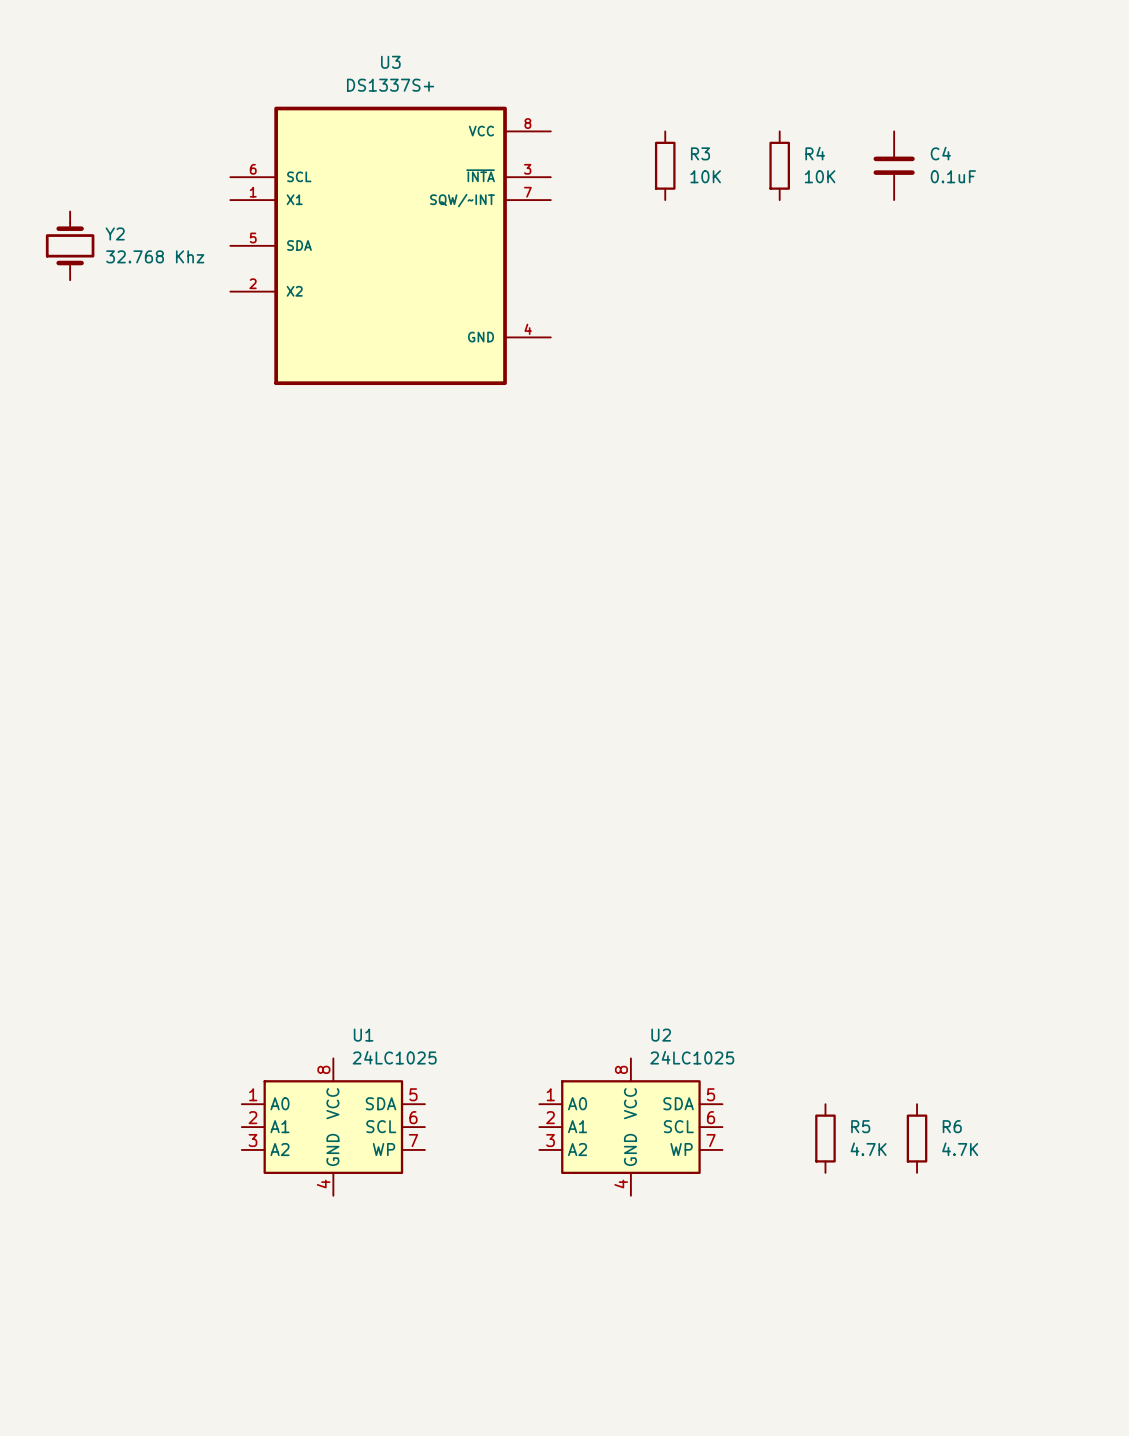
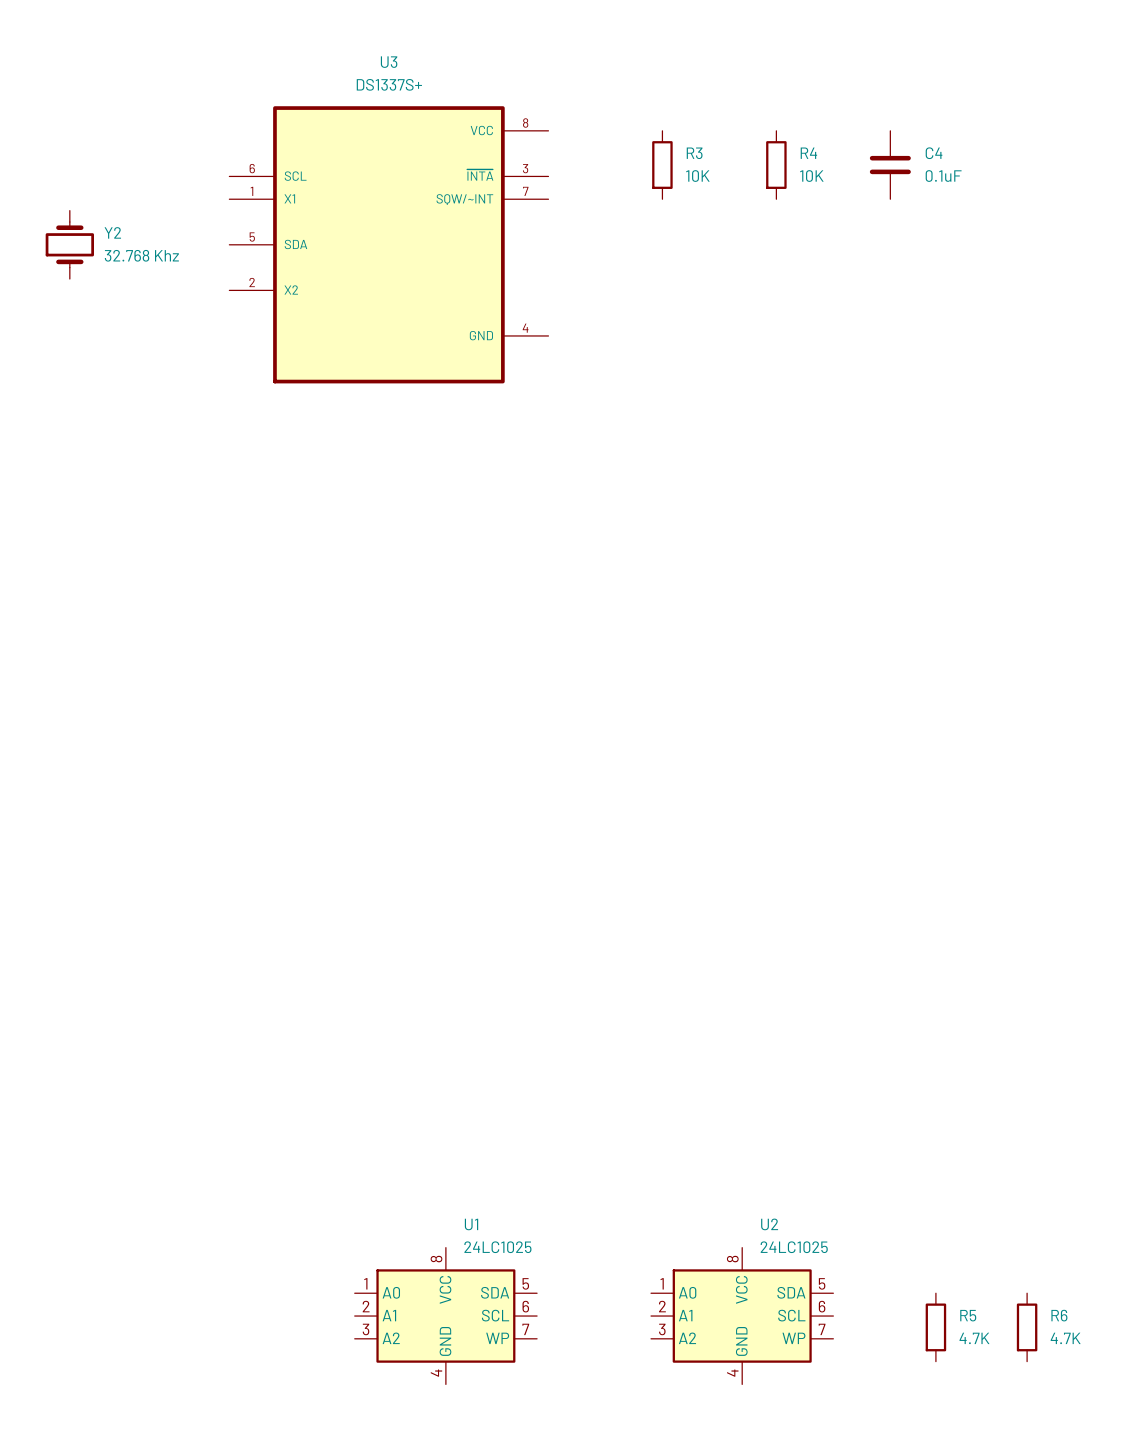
U1 position: (333, 1127) -> (445, 1316)
U2 position: (630, 1127) -> (742, 1316)
R5 position: (825, 1138) -> (935, 1327)
R6 position: (917, 1138) -> (1027, 1327)

